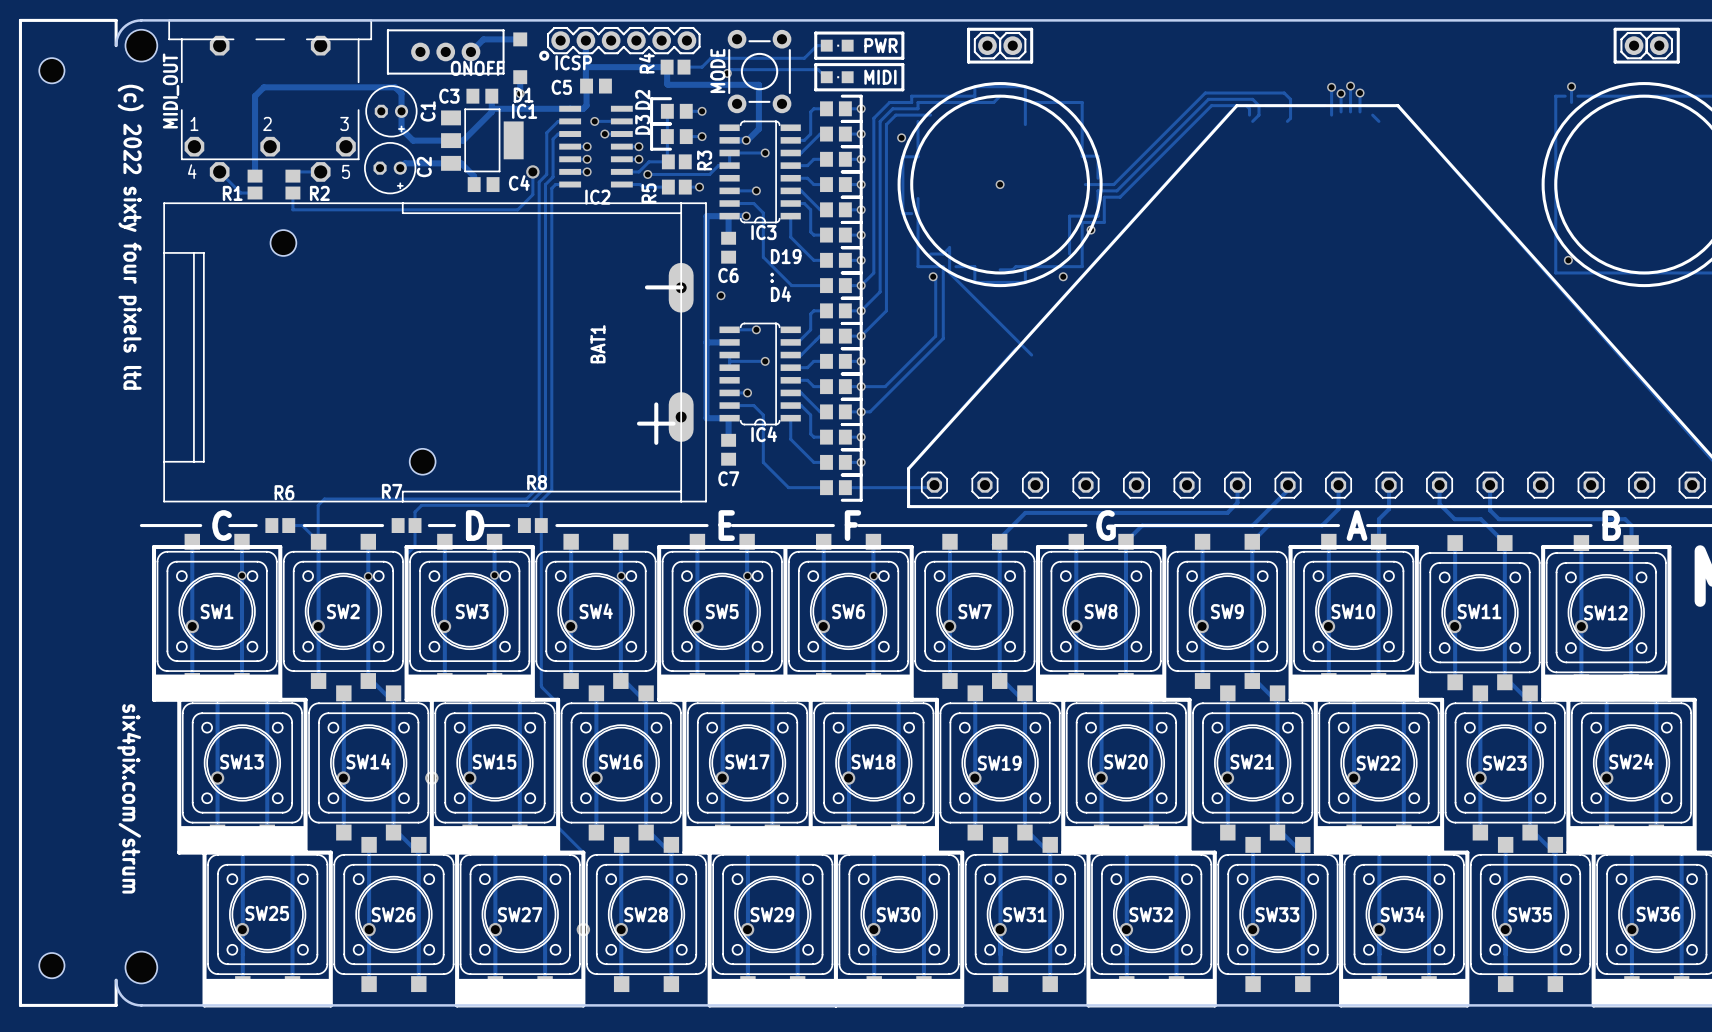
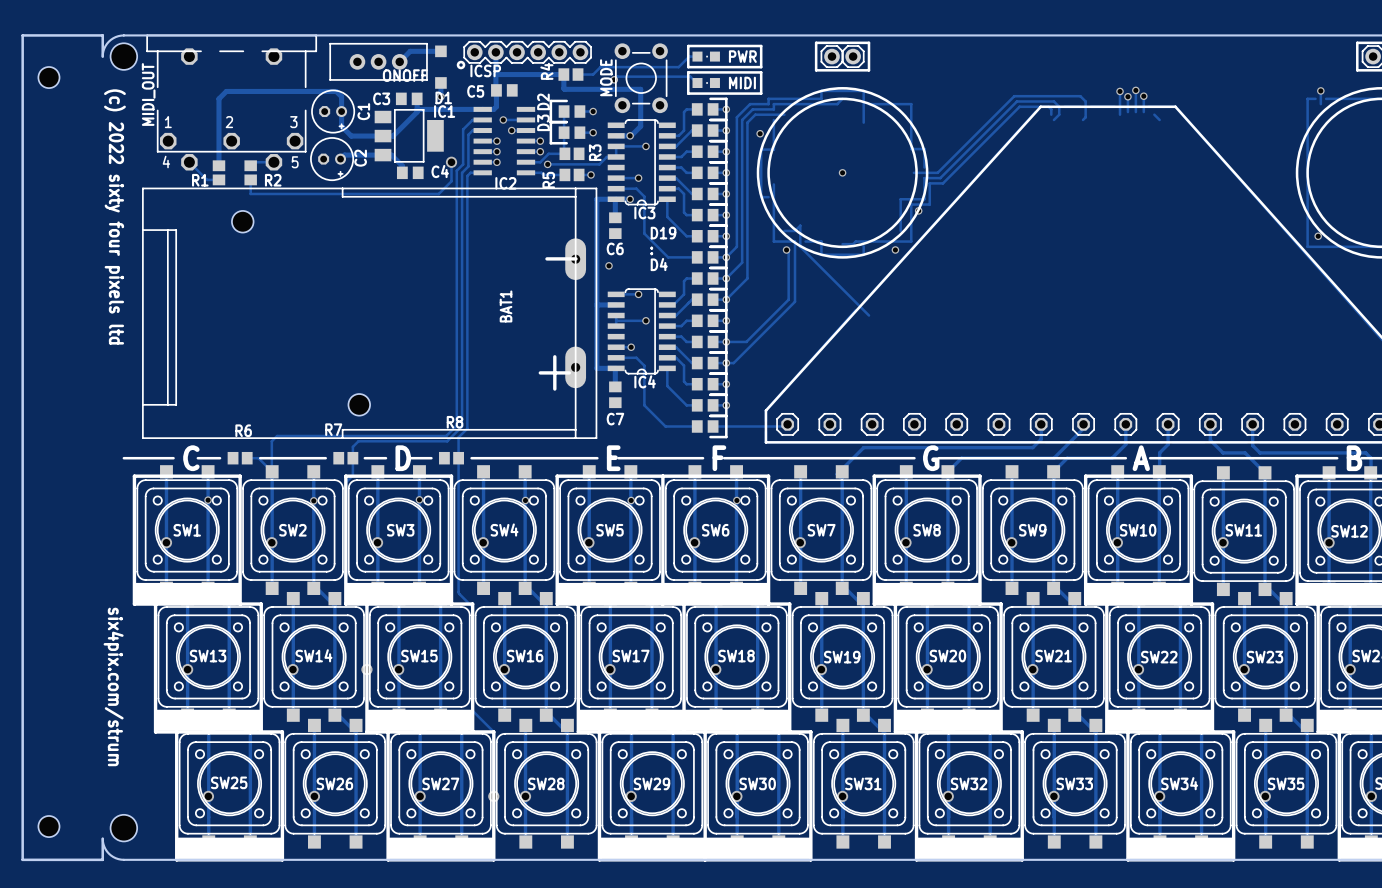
board edge: none -> (102, 56) (102, 35) (22, 35) (22, 859) (102, 859) (102, 838)
line: (116, 45) (116, 20) (20, 20) (20, 1005) (116, 1005) (116, 980) -> none

